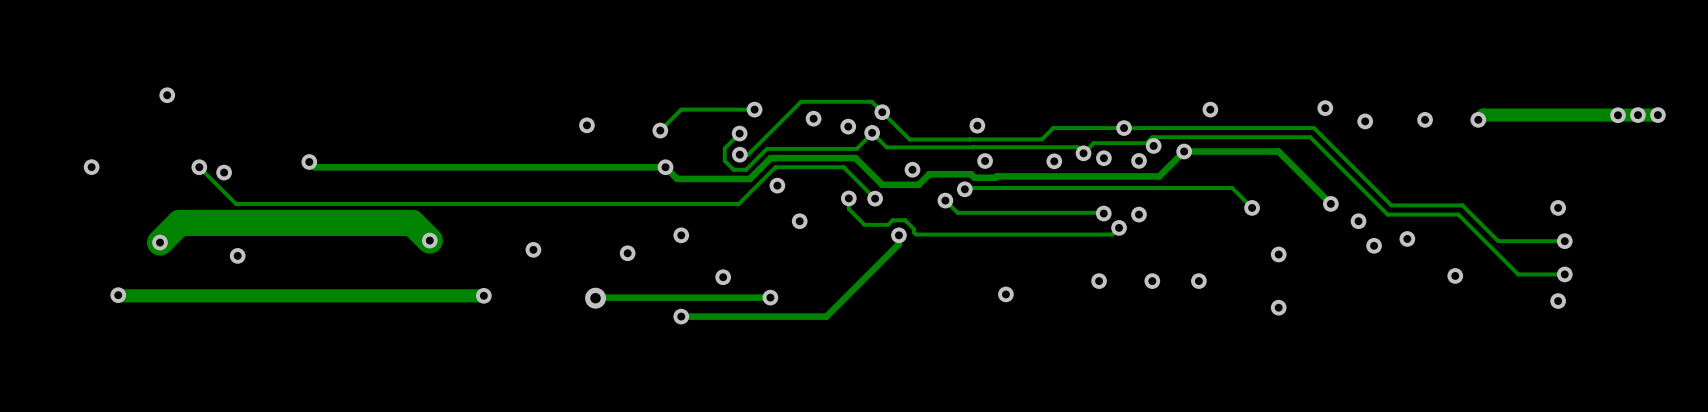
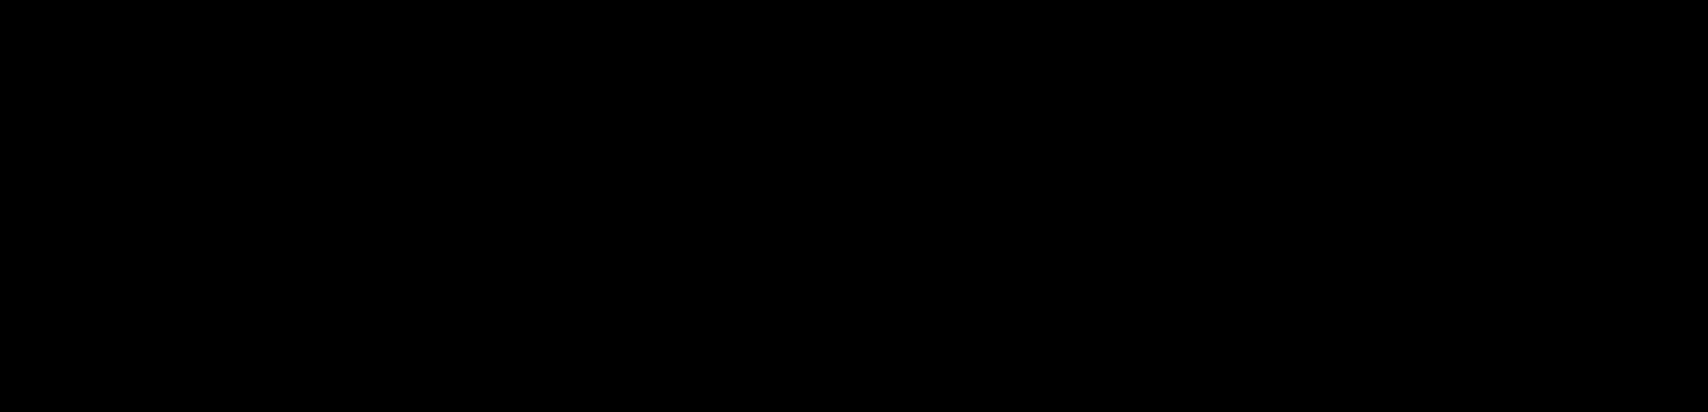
via: (167, 95) -> none
via: (1325, 108) -> none
track: (754, 109) (681, 109) (660, 130) -> none
via: (754, 109) -> none
via: (1210, 109) -> none
via: (882, 112) -> none
via: (1618, 115) -> none
via: (1637, 115) -> none
track: (1657, 115) (1483, 115) (1478, 119) -> none
via: (1657, 115) -> none
via: (813, 118) -> none
via: (1425, 119) -> none
via: (1478, 119) -> none
via: (1365, 121) -> none
via: (586, 125) -> none
via: (977, 125) -> none
via: (848, 126) -> none
via: (1124, 128) -> none
via: (660, 130) -> none
via: (872, 132) -> none
track: (739, 133) (724, 148) (724, 160) (733, 169) (746, 169) (766, 148) (856, 148) (872, 132) (886, 147) (1077, 147) (1083, 153) (1093, 143) (1146, 143) (1152, 137) (1310, 137) (1387, 214) (1458, 214) (1518, 274) (1564, 274) -> none
via: (739, 133) -> none
via: (1153, 145) -> none
via: (1184, 151) -> none
via: (1083, 153) -> none
track: (739, 154) (748, 154) (801, 101) (871, 101) (909, 139) (1041, 139) (1053, 128) (1314, 128) (1391, 205) (1462, 205) (1498, 241) (1564, 241) -> none
via: (739, 154) -> none
via: (1103, 158) -> none
via: (1139, 160) -> none
via: (985, 161) -> none
via: (1054, 161) -> none
track: (309, 162) (314, 167) (665, 167) (677, 178) (749, 178) (770, 158) (855, 158) (882, 184) (918, 184) (929, 174) (971, 174) (974, 177) (1159, 176) (1184, 151) (1278, 151) (1330, 203) -> none
via: (309, 162) -> none
via: (91, 167) -> none
track: (199, 167) (235, 203) (738, 203) (775, 167) (843, 167) (875, 198) -> none
via: (199, 167) -> none
via: (665, 167) -> none
via: (912, 169) -> none
via: (224, 172) -> none
via: (777, 185) -> none
track: (964, 189) (1232, 187) (1252, 207) -> none
via: (964, 189) -> none
track: (848, 198) (848, 209) (864, 224) (888, 224) (892, 220) (905, 220) (914, 229) (916, 234) (1112, 234) (1119, 227) -> none
via: (848, 198) -> none
via: (875, 198) -> none
track: (945, 200) (957, 212) (1103, 213) -> none
via: (945, 200) -> none
via: (1330, 203) -> none
via: (1252, 207) -> none
via: (1558, 207) -> none
via: (1103, 213) -> none
via: (1138, 214) -> none
via: (799, 221) -> none
via: (1358, 221) -> none
via: (1119, 227) -> none
via: (681, 235) -> none
track: (898, 235) (898, 244) (826, 316) (681, 316) -> none
via: (898, 235) -> none
via: (1407, 238) -> none
track: (429, 240) (412, 222) (179, 222) (160, 242) -> none
via: (429, 240) -> none
via: (1564, 241) -> none
via: (160, 242) -> none
via: (1374, 245) -> none
via: (533, 249) -> none
via: (627, 253) -> none
via: (1278, 254) -> none
via: (237, 255) -> none
via: (1564, 274) -> none
via: (1455, 275) -> none
via: (723, 277) -> none
via: (1099, 281) -> none
via: (1152, 281) -> none
via: (1198, 281) -> none
via: (1005, 294) -> none
track: (118, 295) (483, 295) -> none
via: (118, 295) -> none
via: (483, 295) -> none
track: (770, 297) (595, 298) -> none
via: (770, 297) -> none
via: (595, 298) -> none
via: (1558, 301) -> none
via: (1278, 307) -> none
via: (681, 316) -> none

